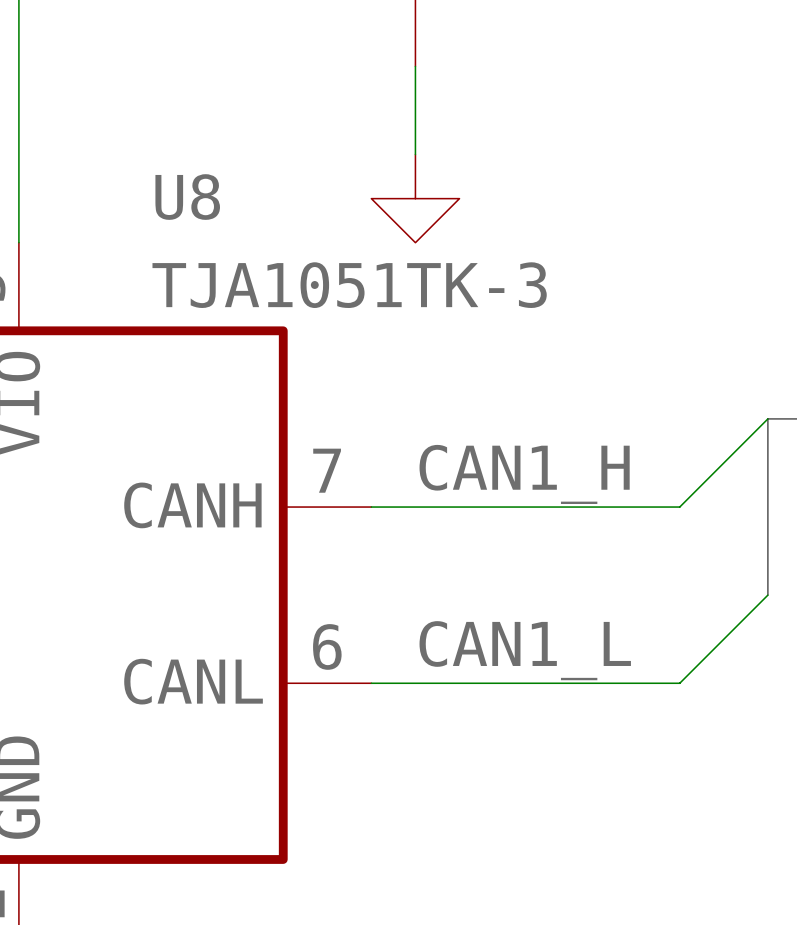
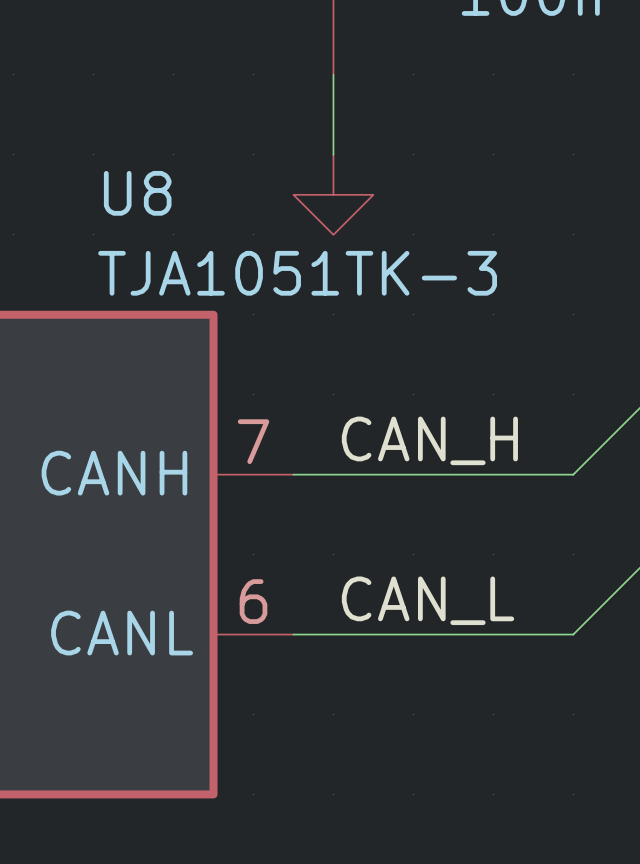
label: CAN1_H (524, 474) -> CAN_H (429, 440)
label: CAN1_L (525, 650) -> CAN_L (427, 600)

